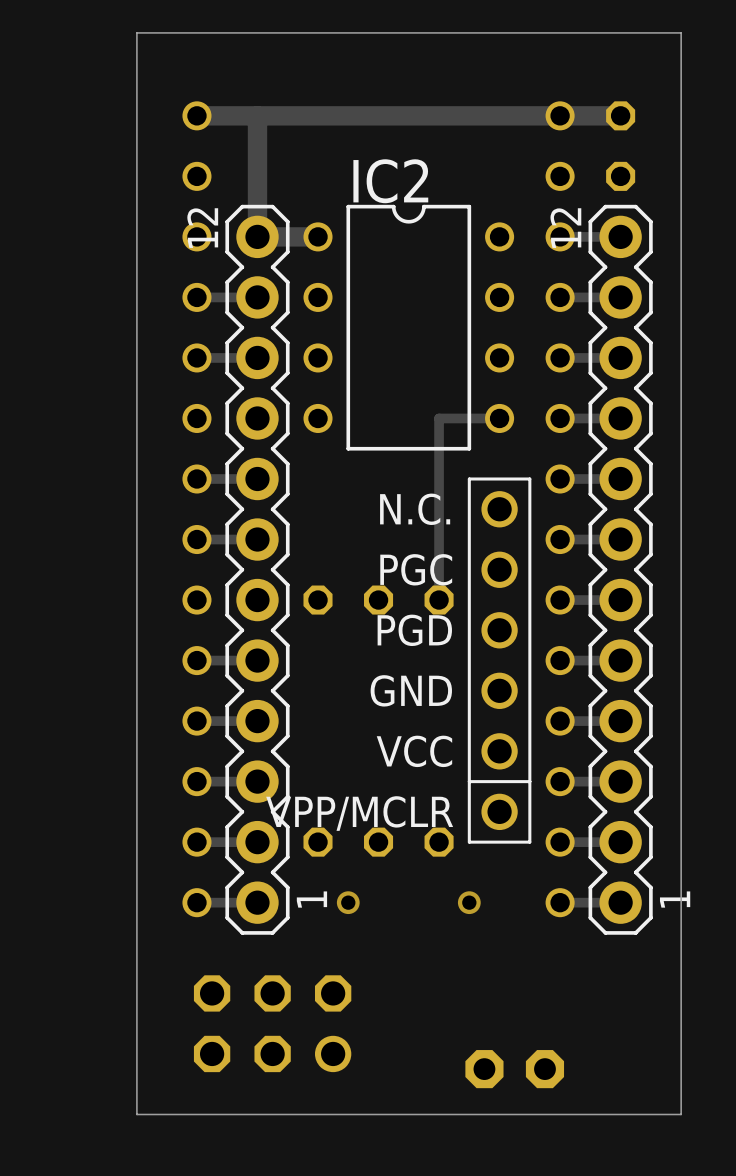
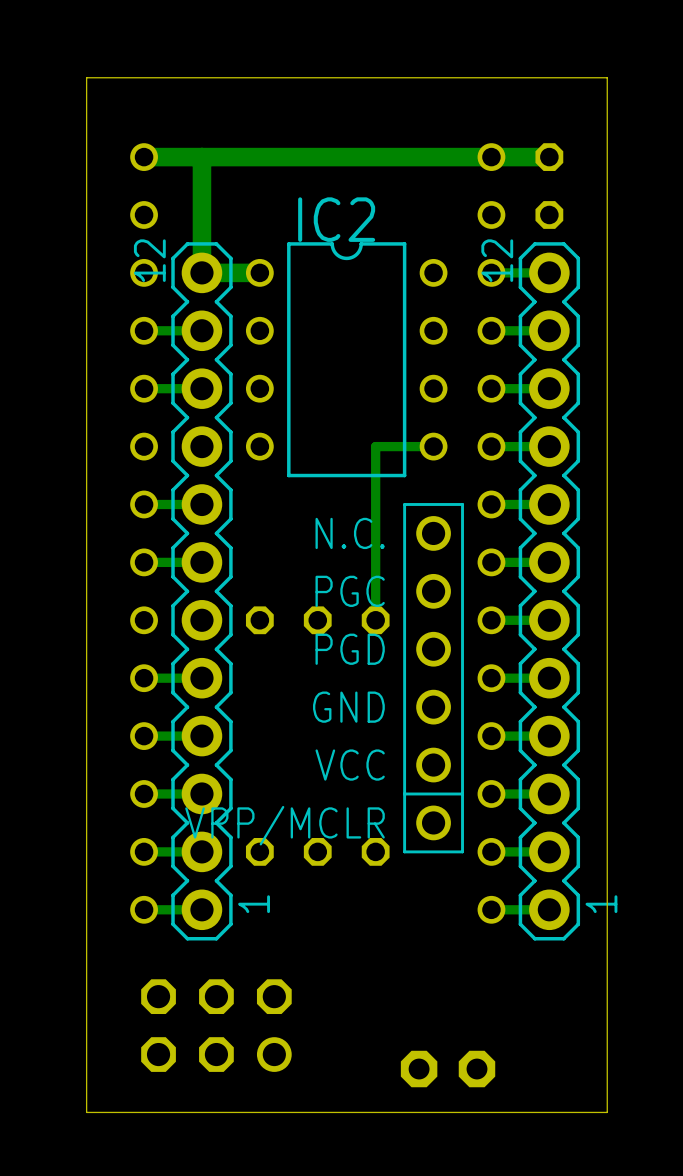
via: (348, 902) -> none
via: (469, 902) -> none

